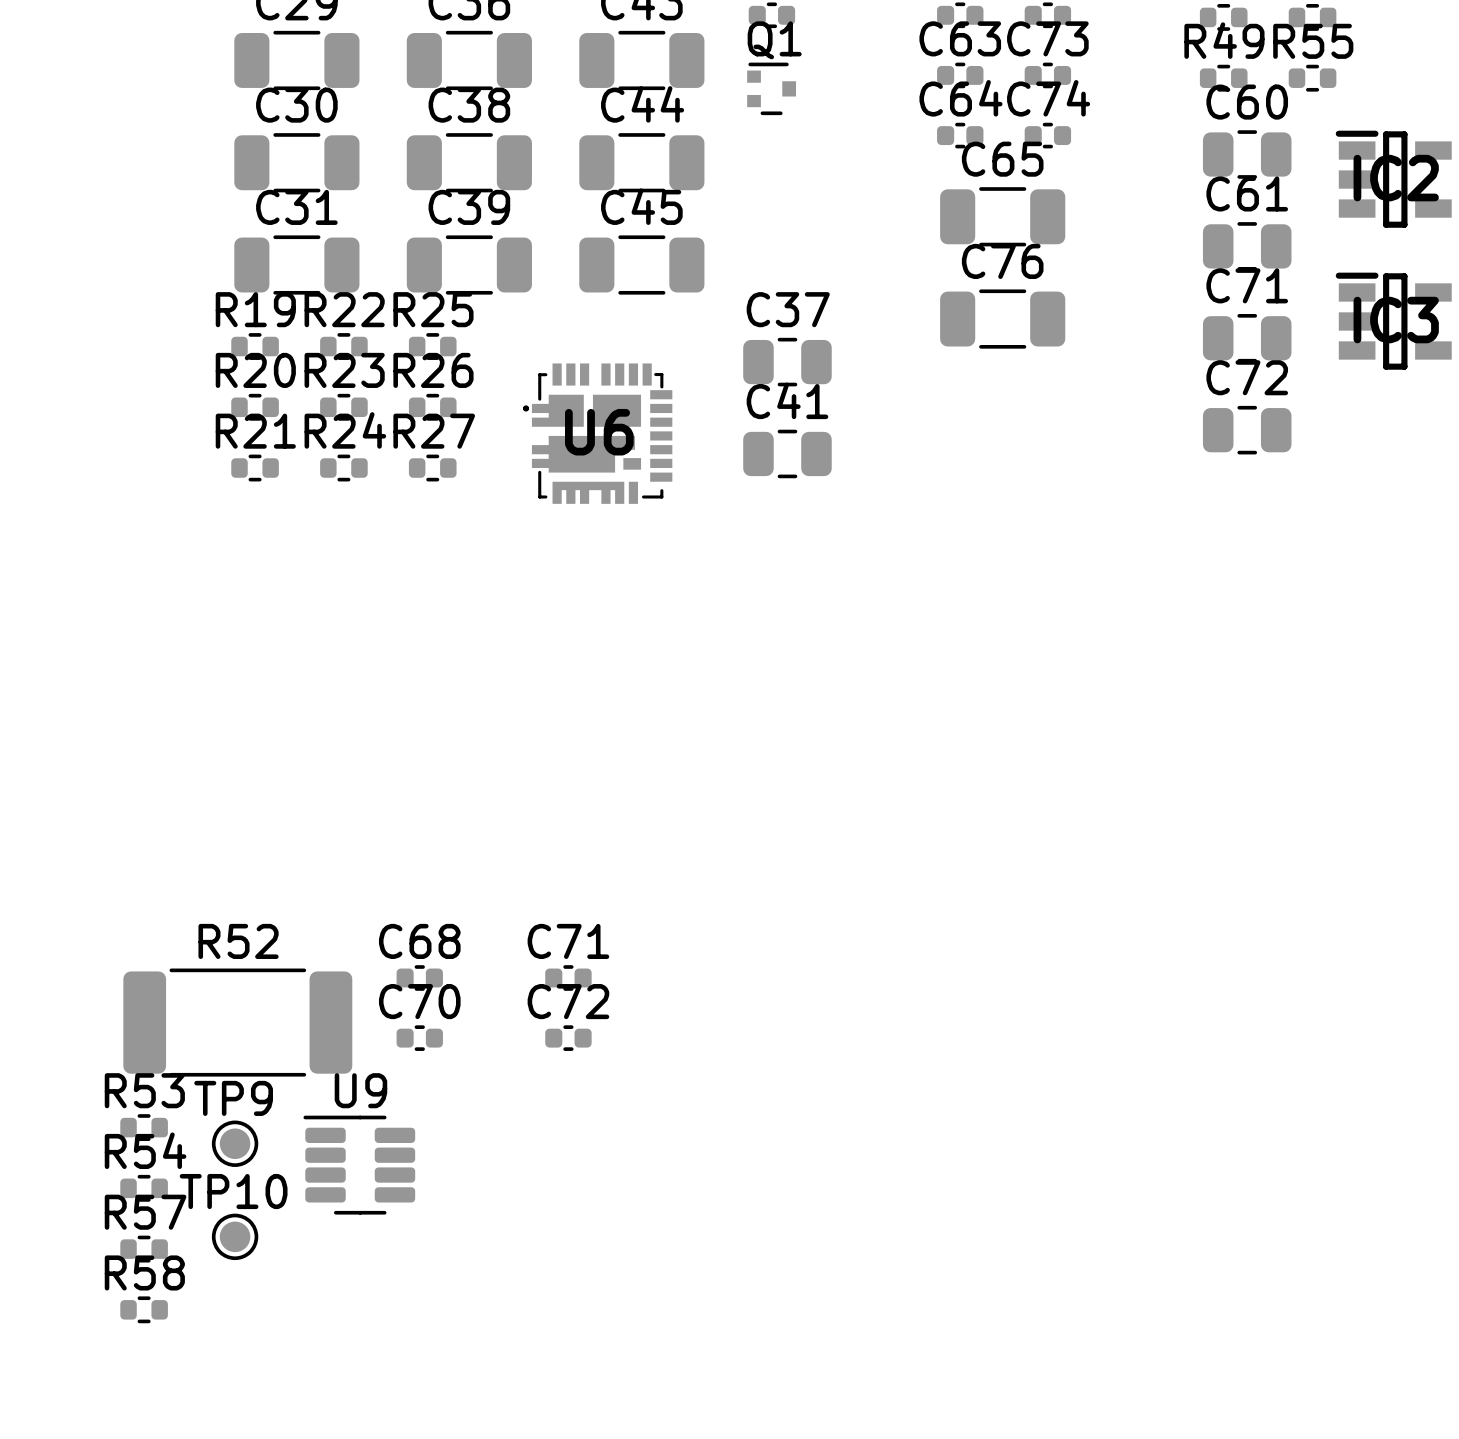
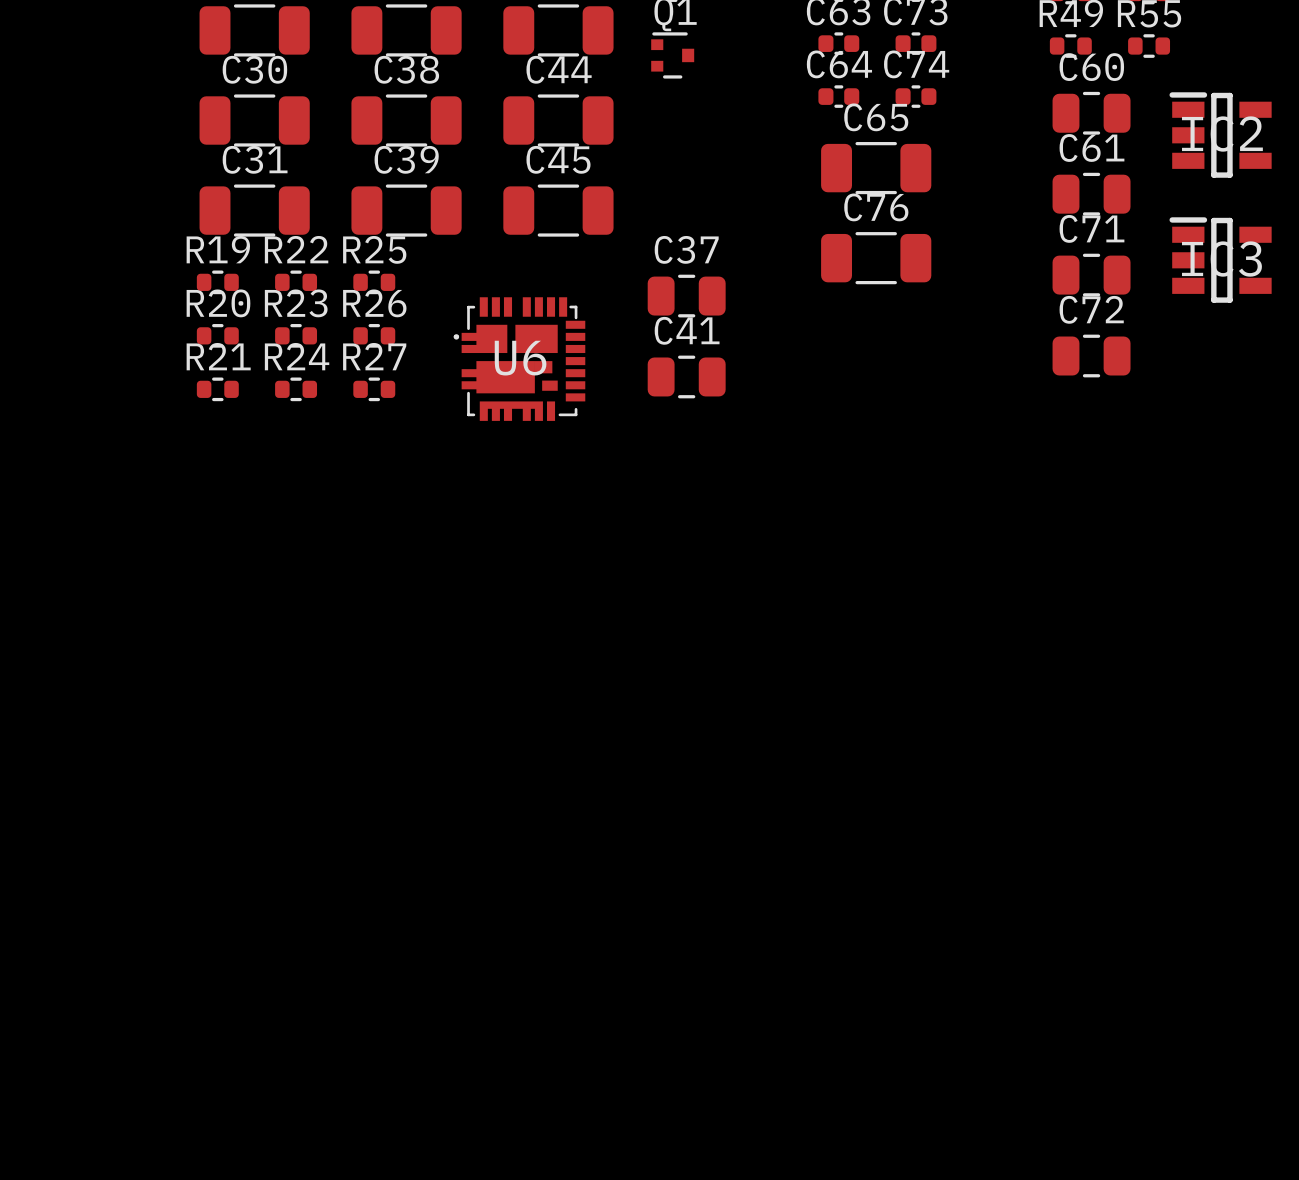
C68: (419, 977) -> none
C71: (568, 977) -> none
R52: (237, 1022) -> none
C70: (419, 1038) -> none
C72: (568, 1038) -> none
R53: (144, 1127) -> none
TP9: (235, 1143) -> none
U9: (359, 1165) -> none
R54: (144, 1188) -> none
TP10: (235, 1236) -> none
R57: (144, 1249) -> none
R58: (144, 1309) -> none

